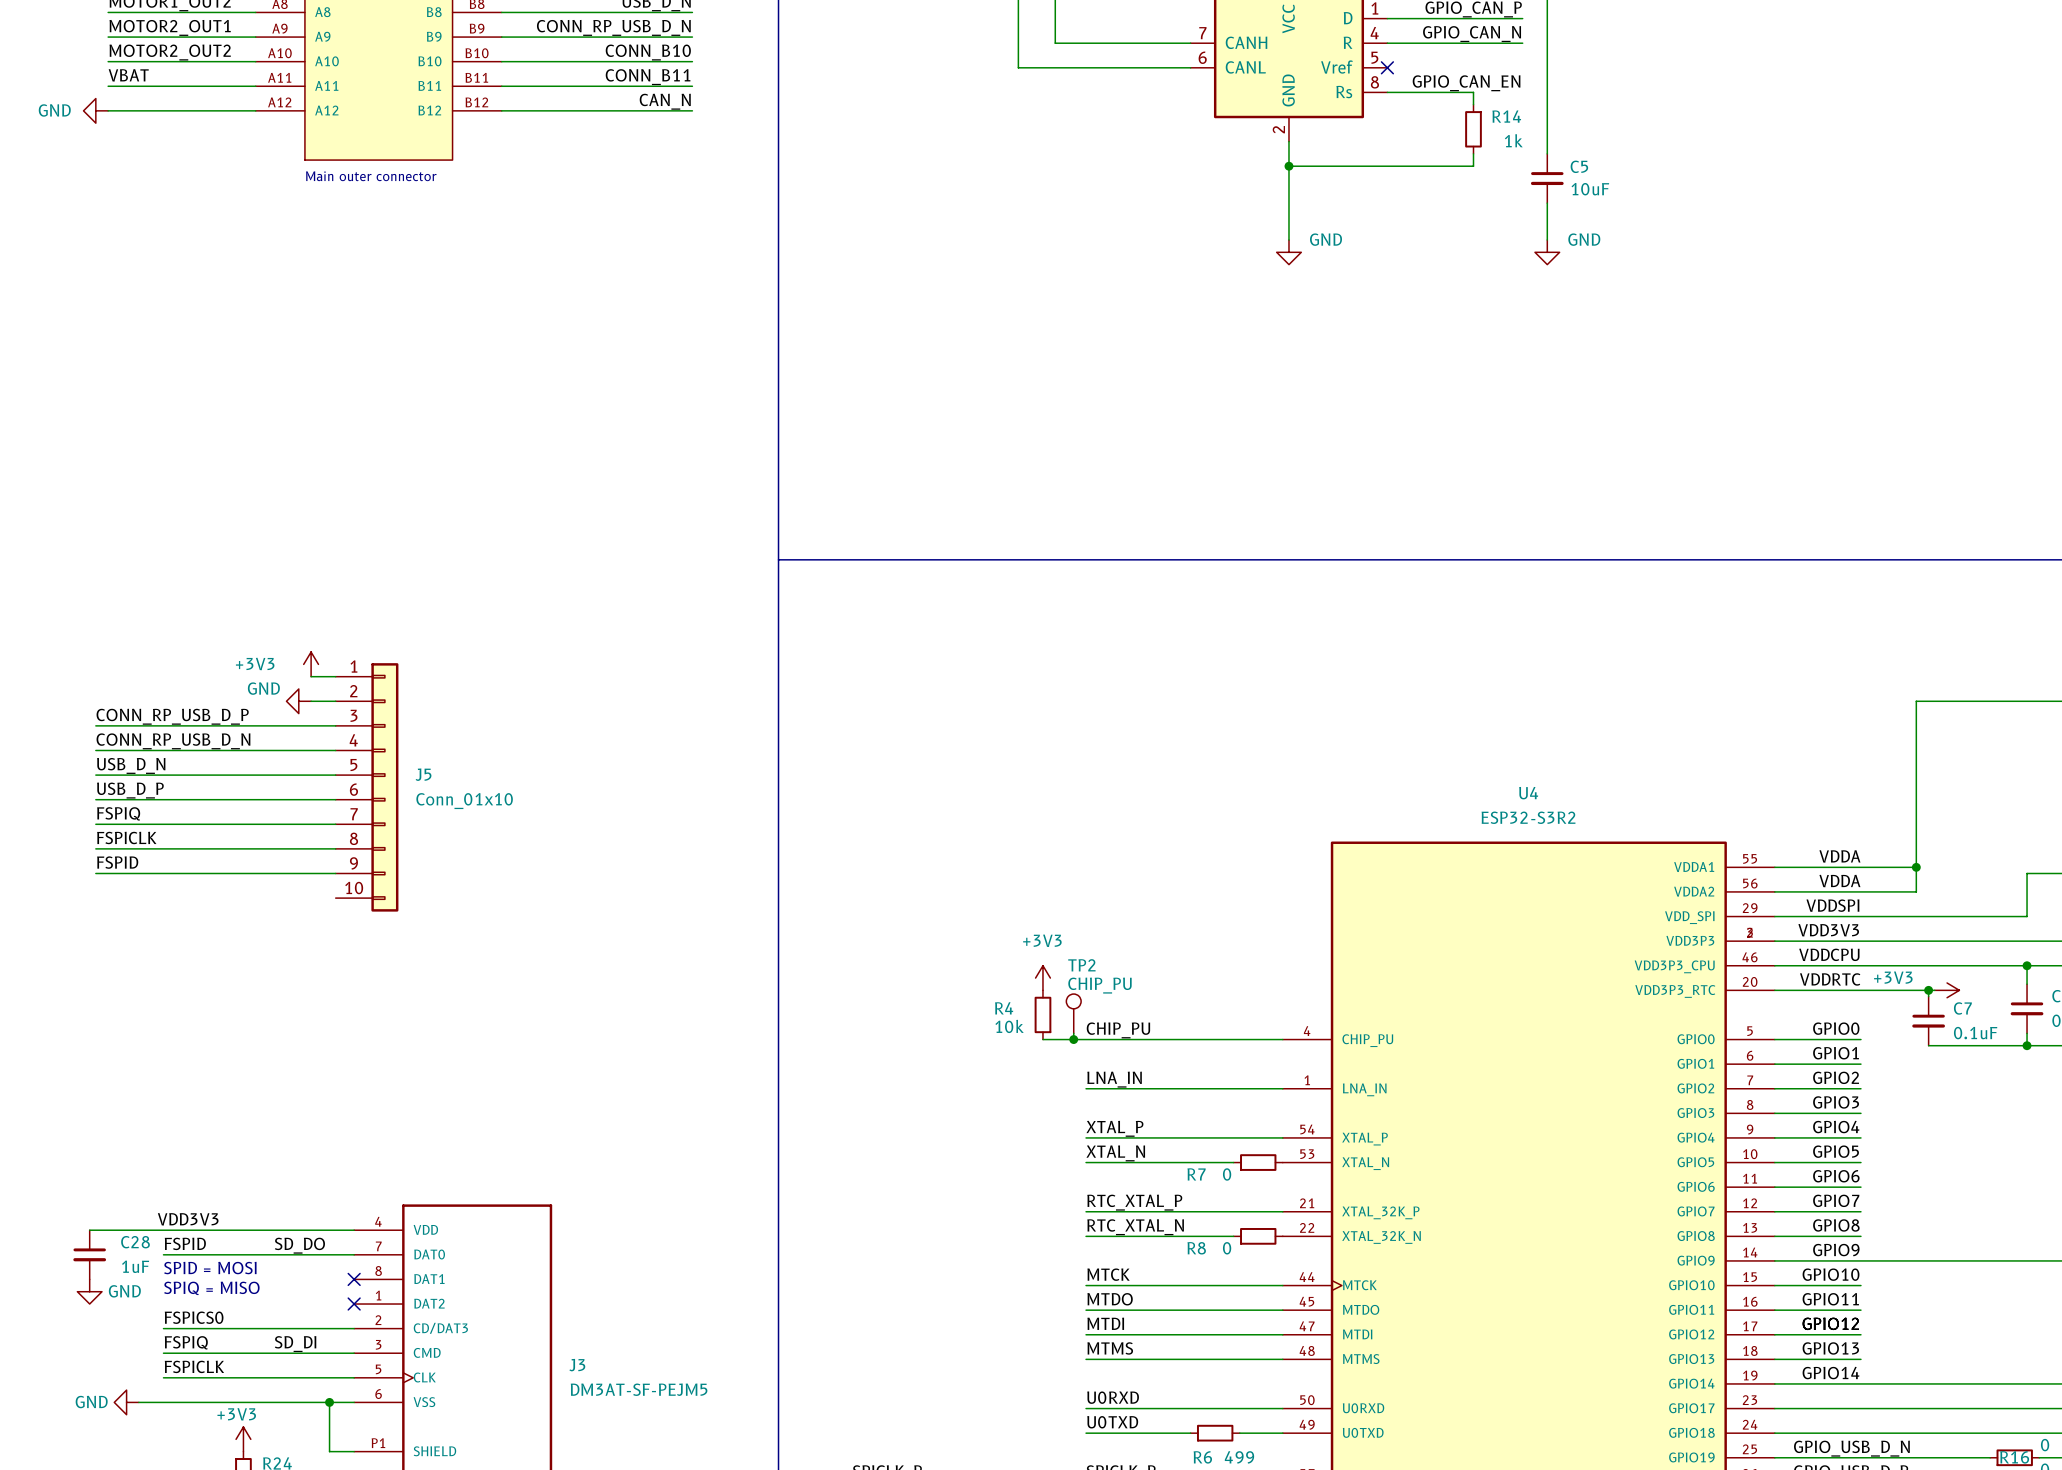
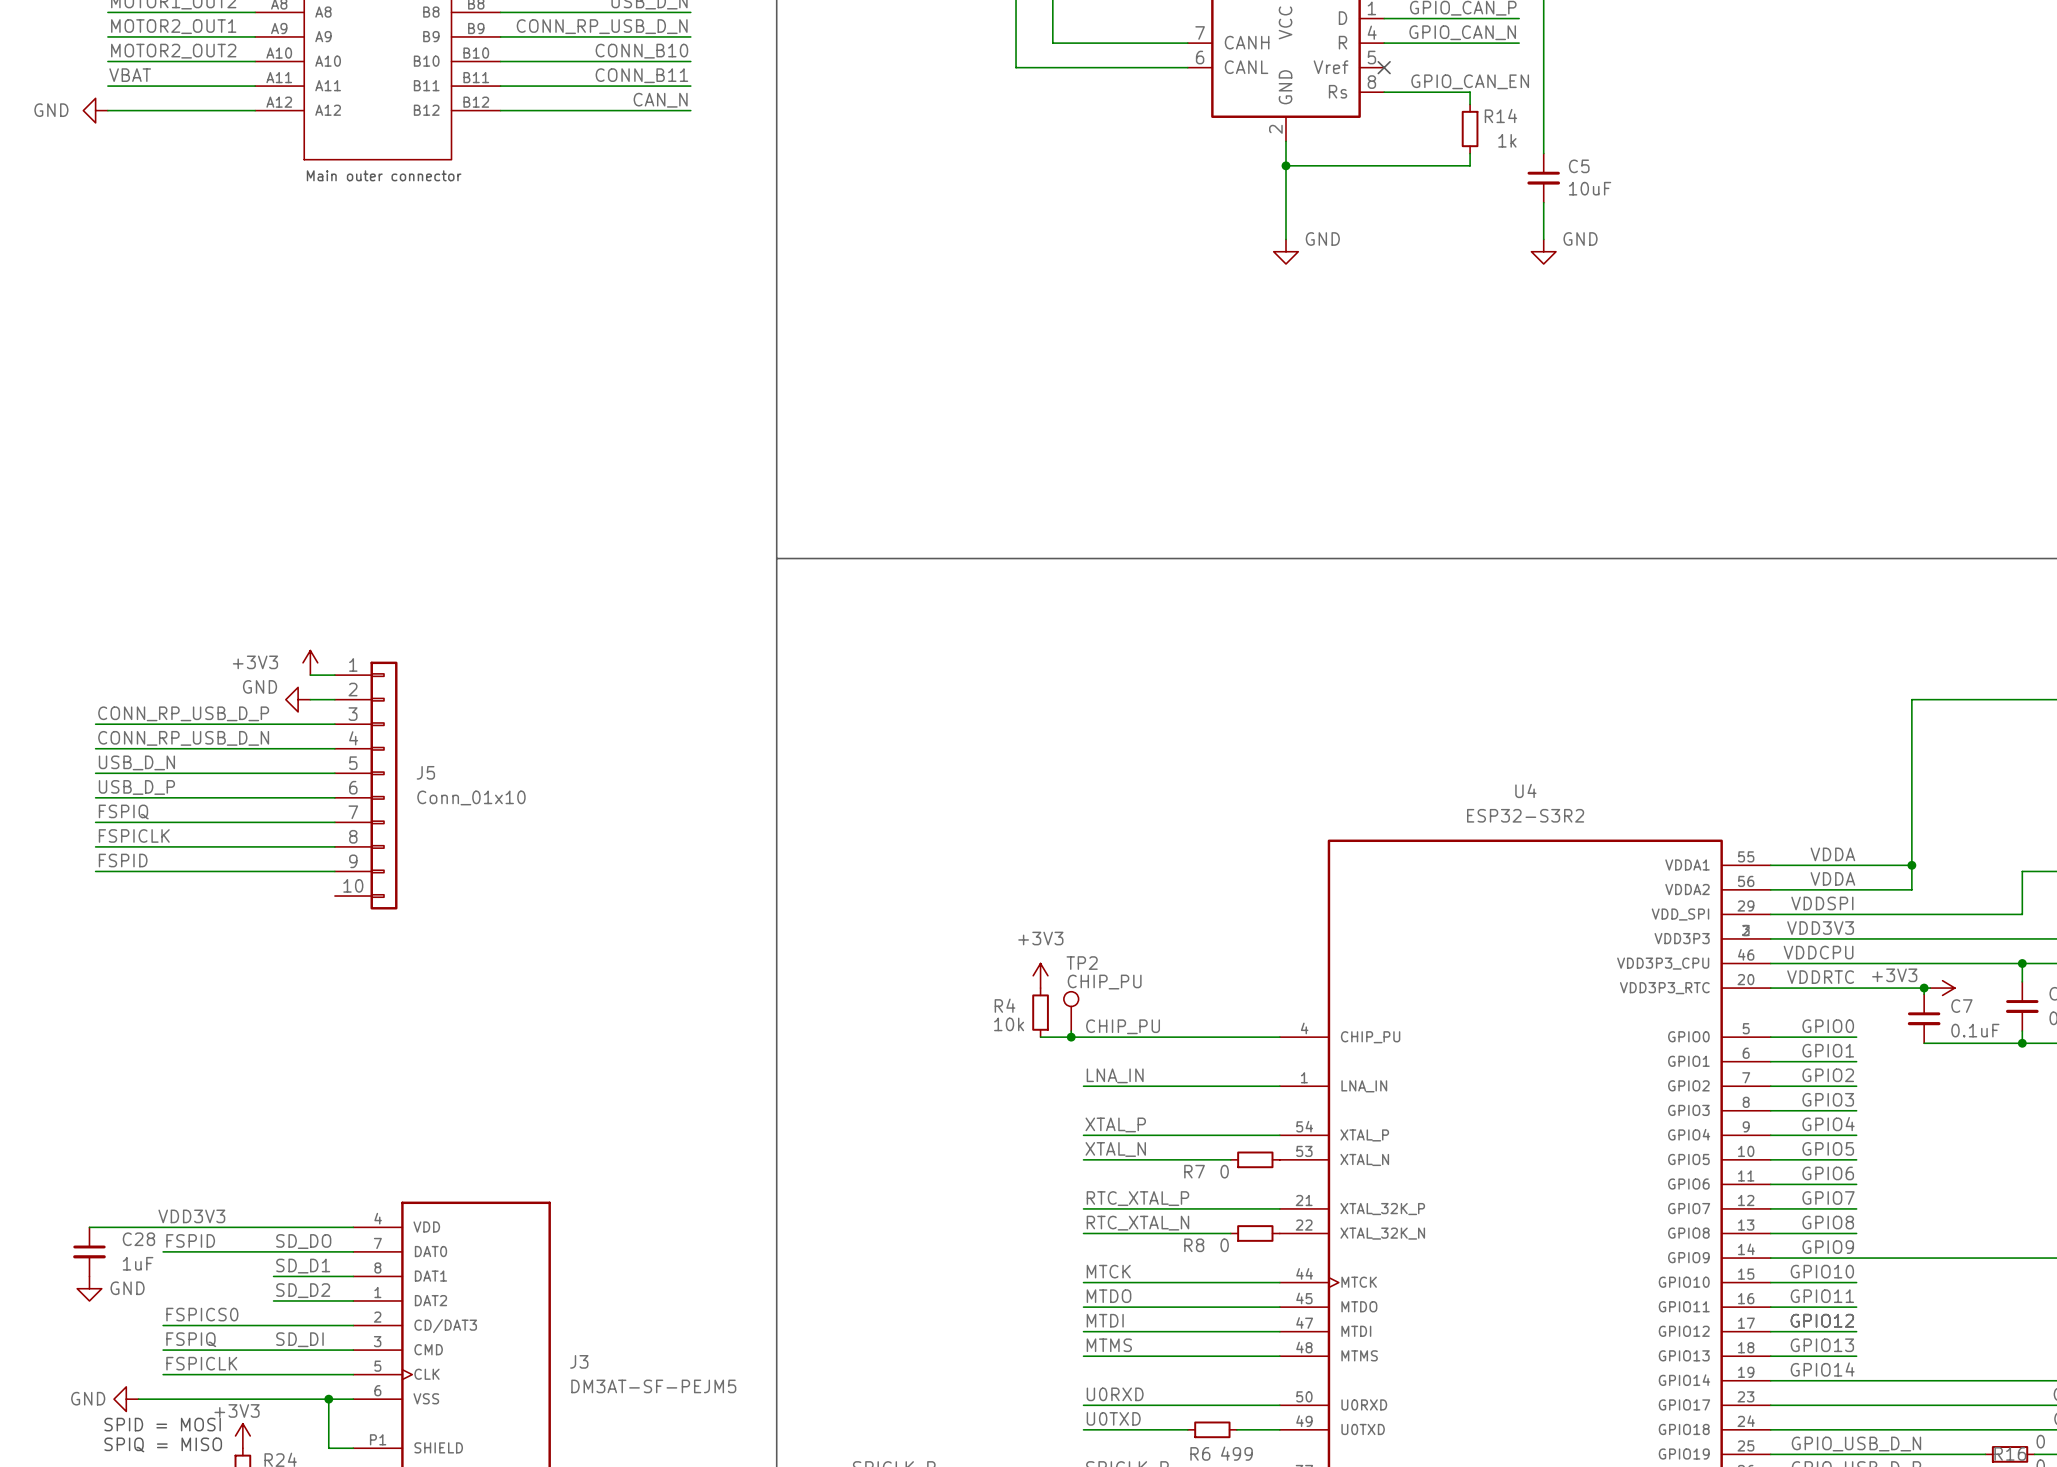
text position: SPID = MOSI (210, 1268) -> SPID = MOSI (162, 1424)
label: none -> SD_D1 (303, 1266)
wire: none -> (273, 1276) (353, 1276)
no-connect mark: (354, 1279) -> none
text position: SPIQ = MISO (211, 1288) -> SPIQ = MISO (163, 1444)
label: none -> SD_D2 (303, 1290)
wire: none -> (273, 1300) (353, 1300)
no-connect mark: (354, 1304) -> none

